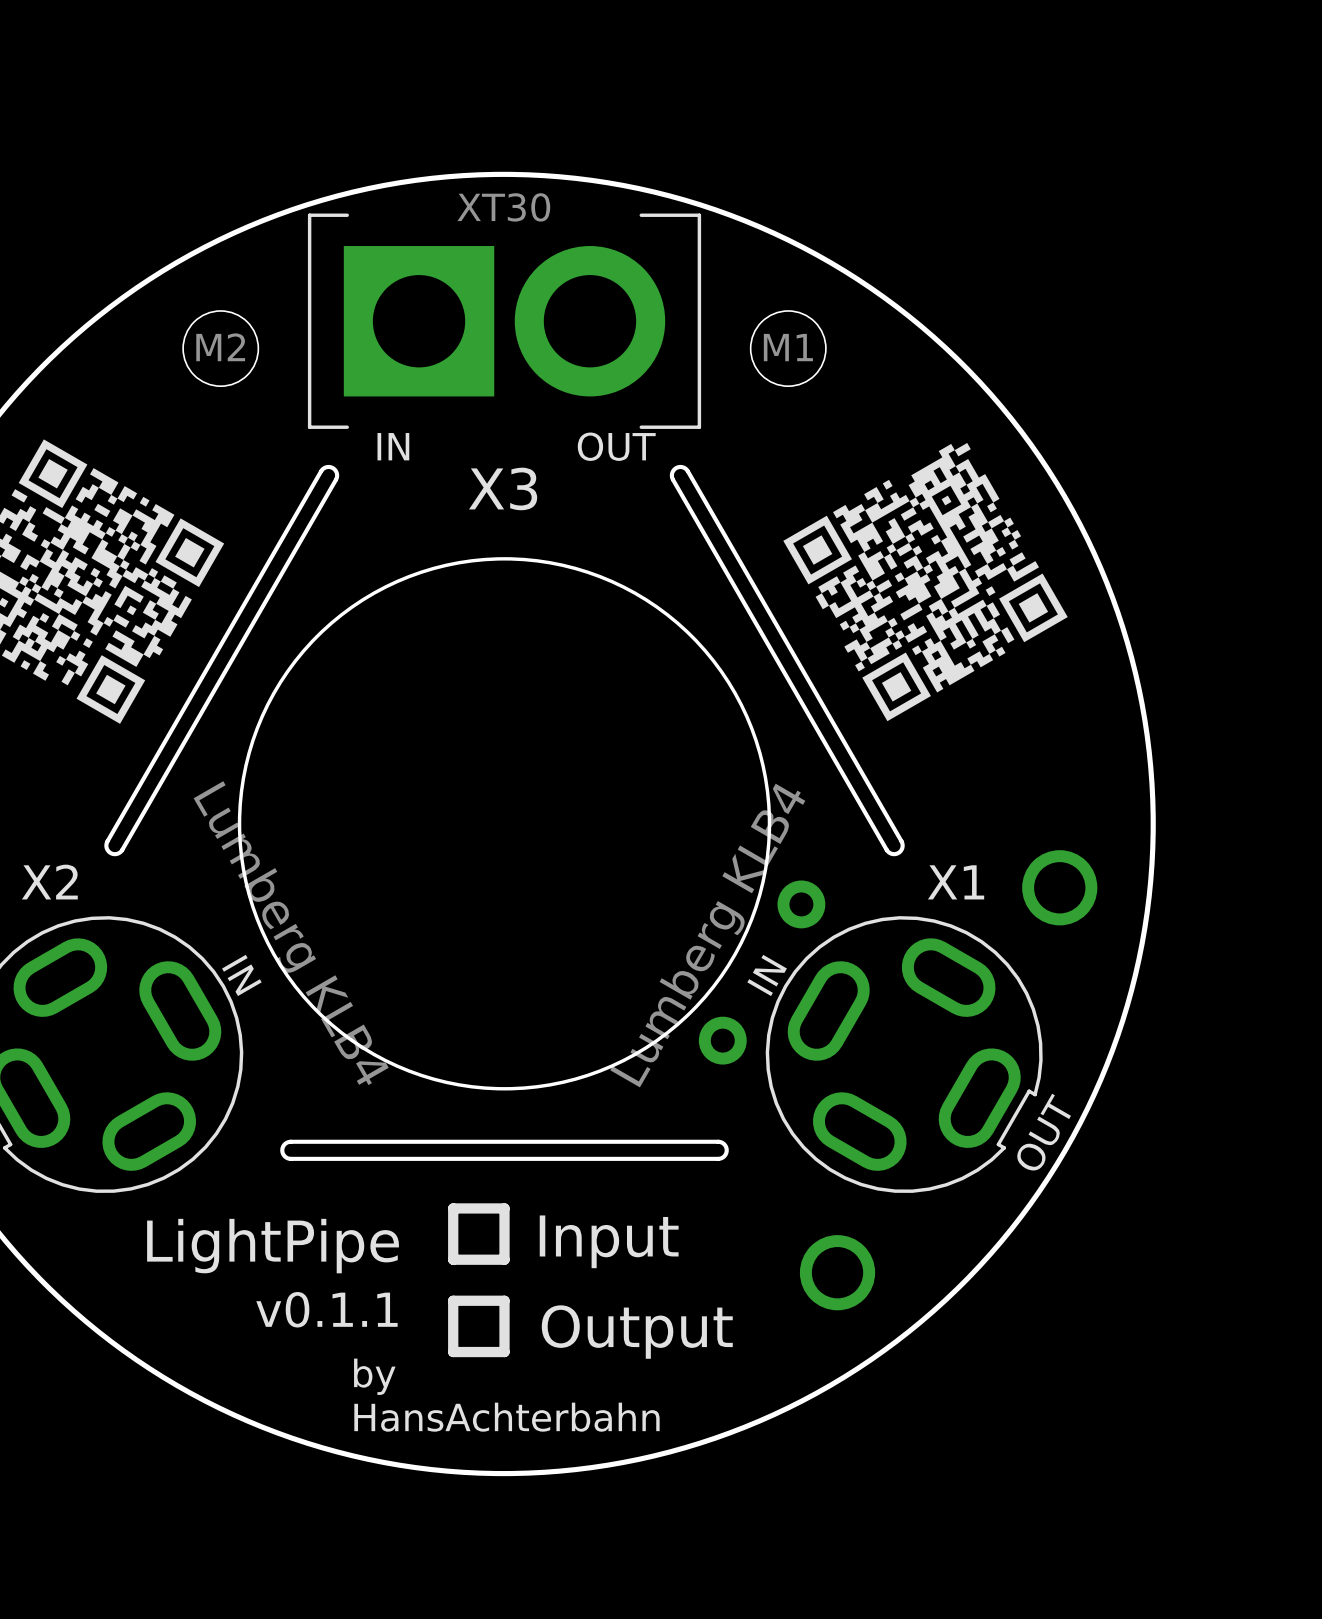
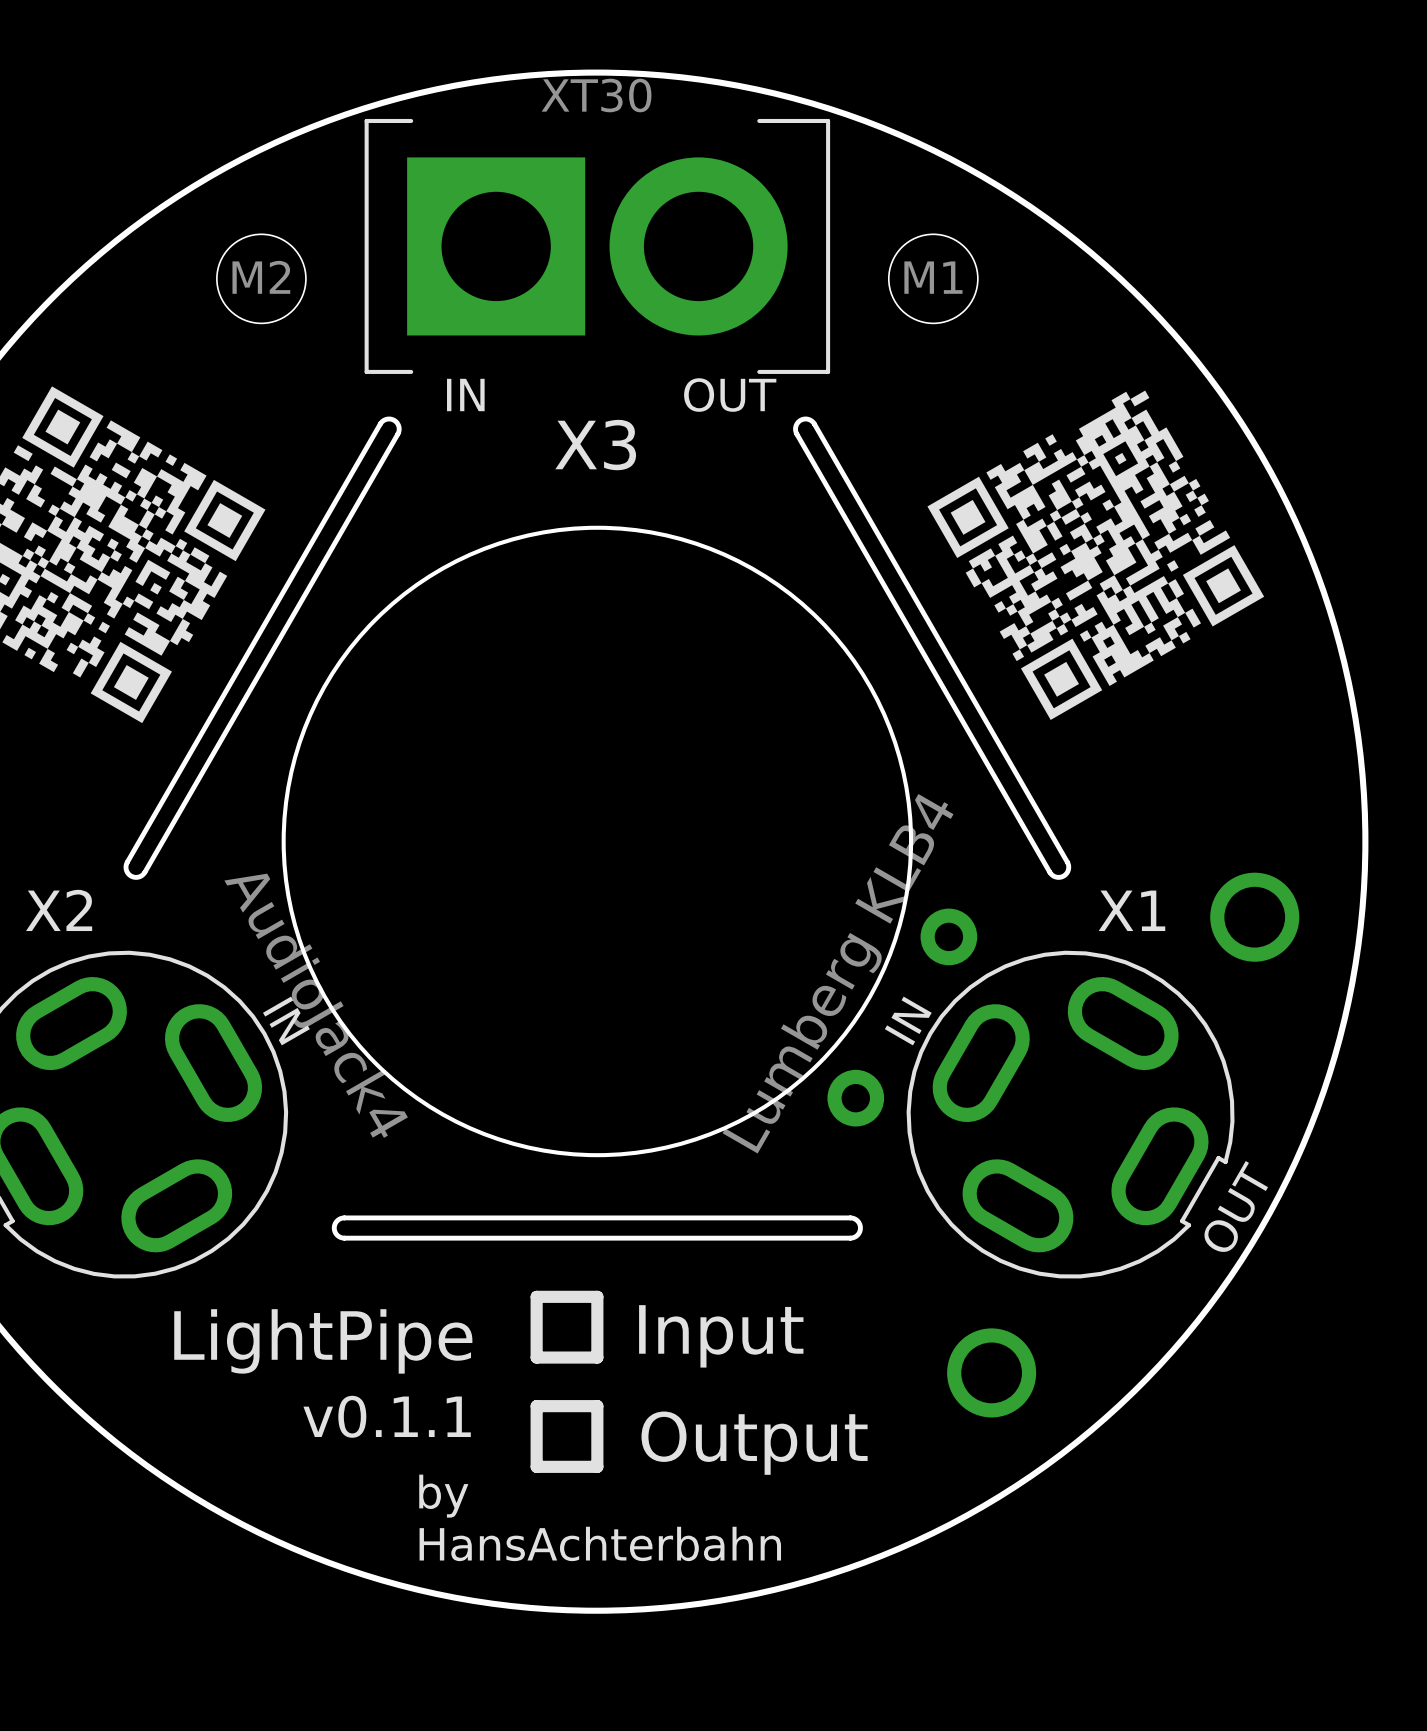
X3 value position: XT30 (503, 207) -> XT30 (596, 95)
X2 value: Lumberg KLB4 (291, 933) -> AudioJack4 (316, 1005)

